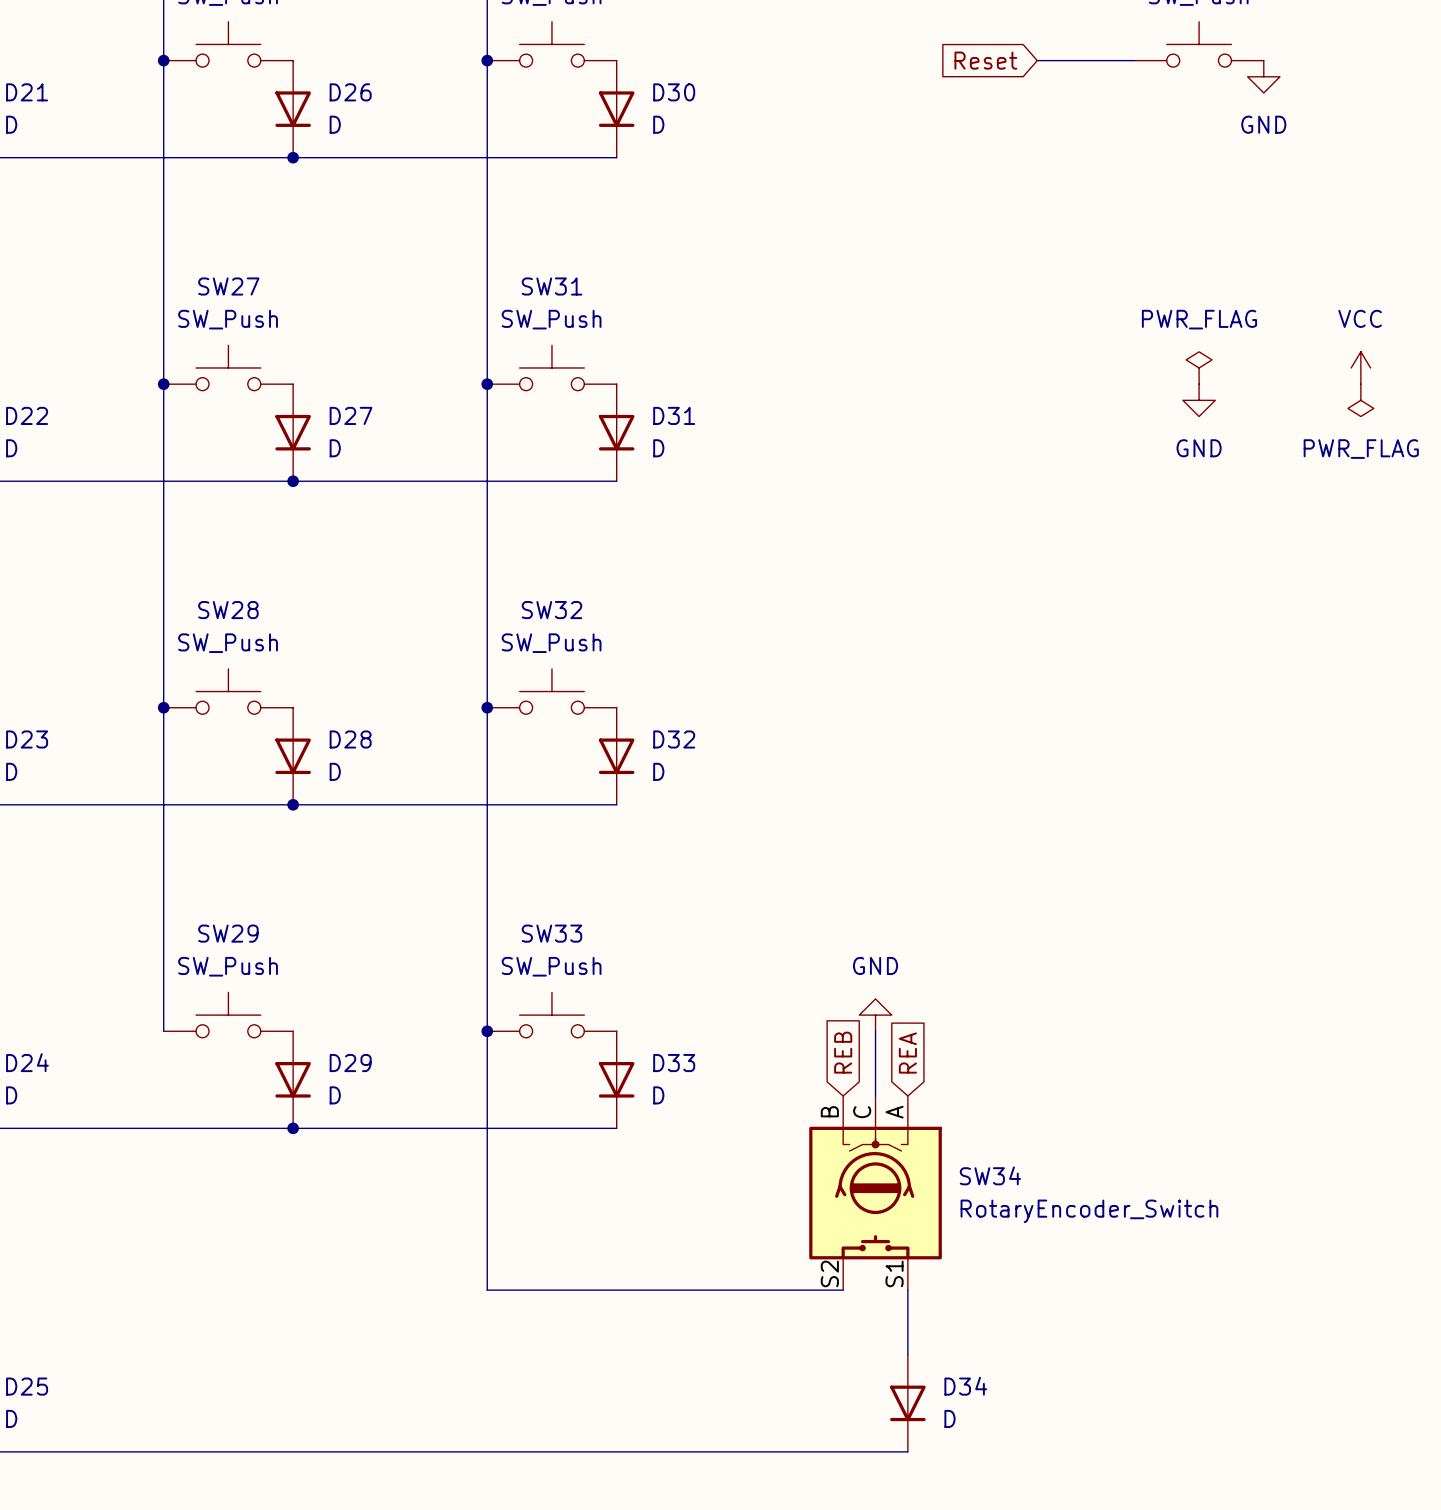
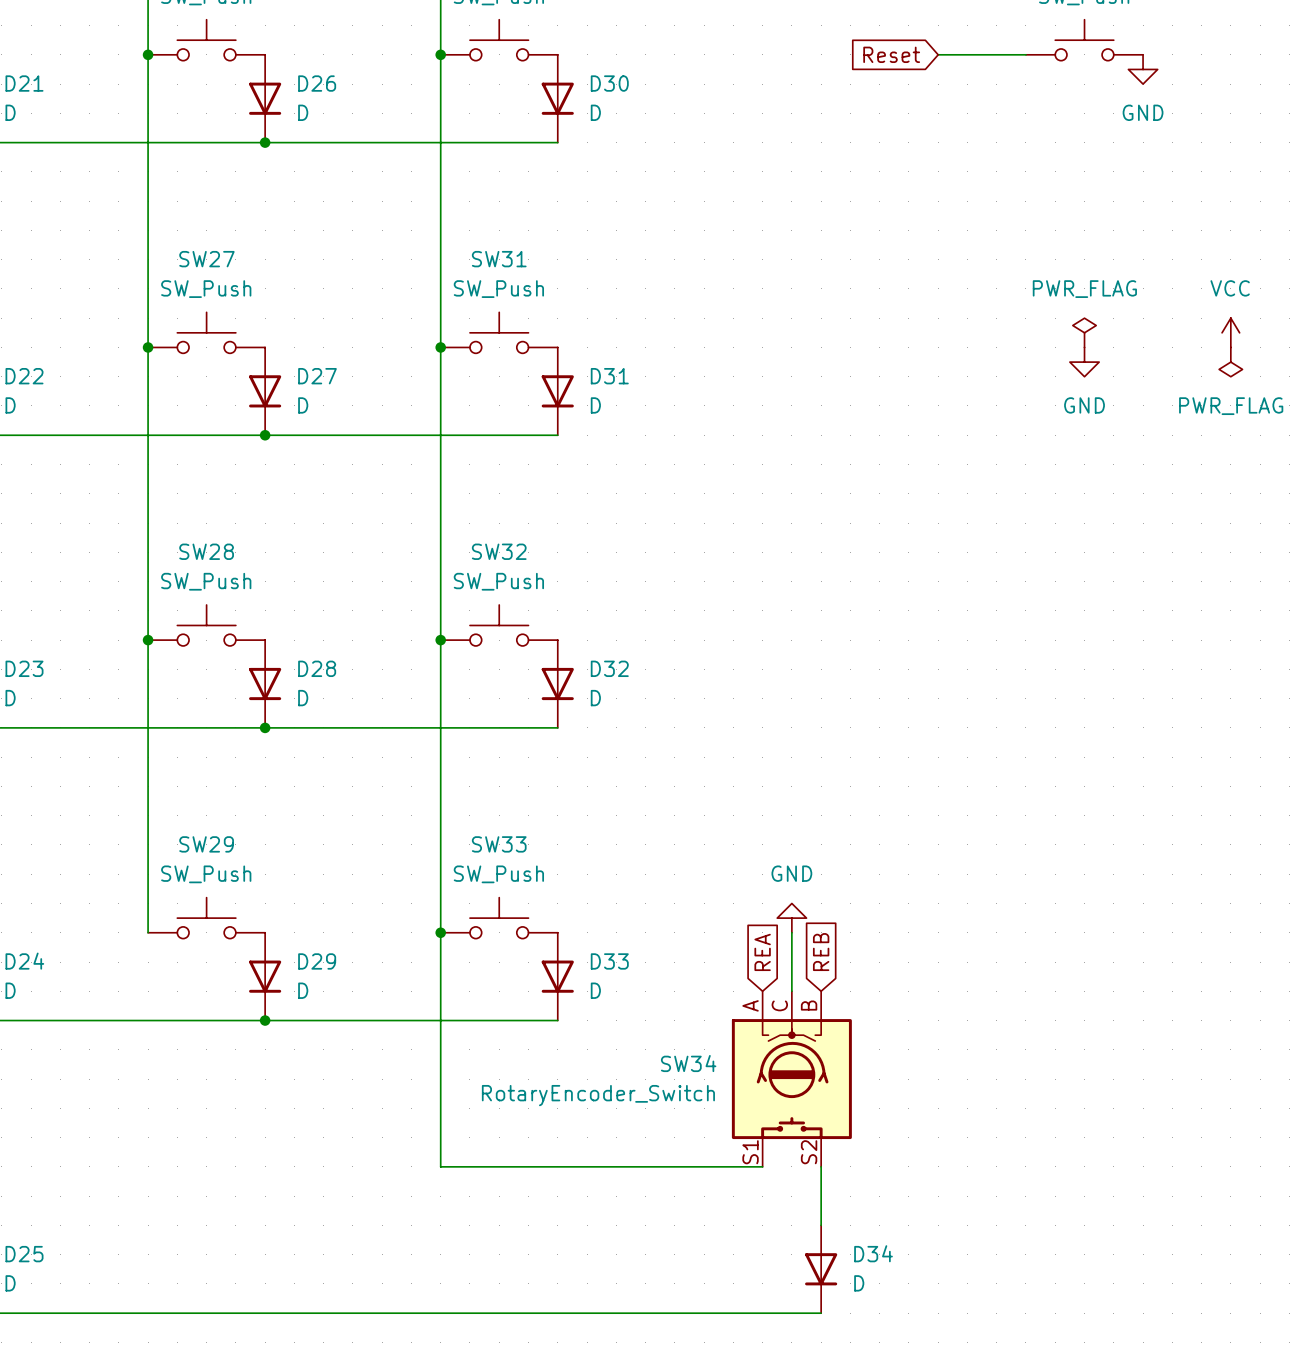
global label: REB (843, 1052) -> REA (762, 952)
global label: REA (907, 1053) -> REB (821, 952)
SW34 flip: as is (875, 1193) -> left-right (791, 1079)

